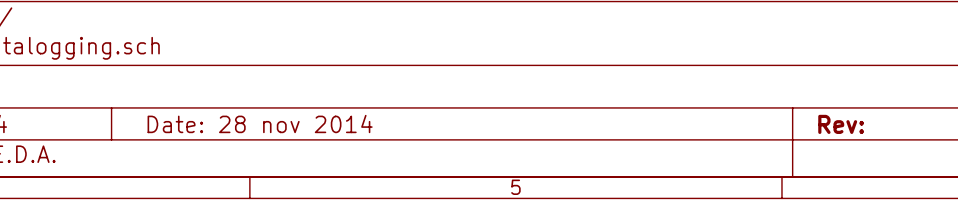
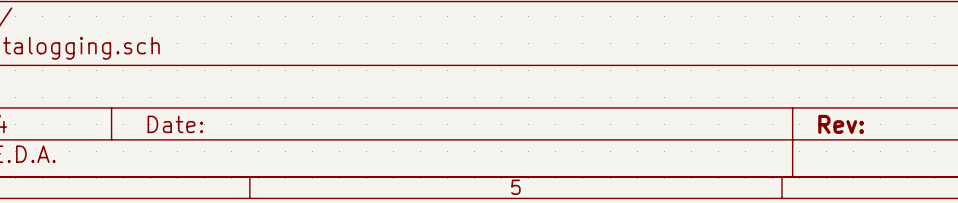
title block: Date: 28 nov 2014 (260, 124) -> Date: (175, 124)

